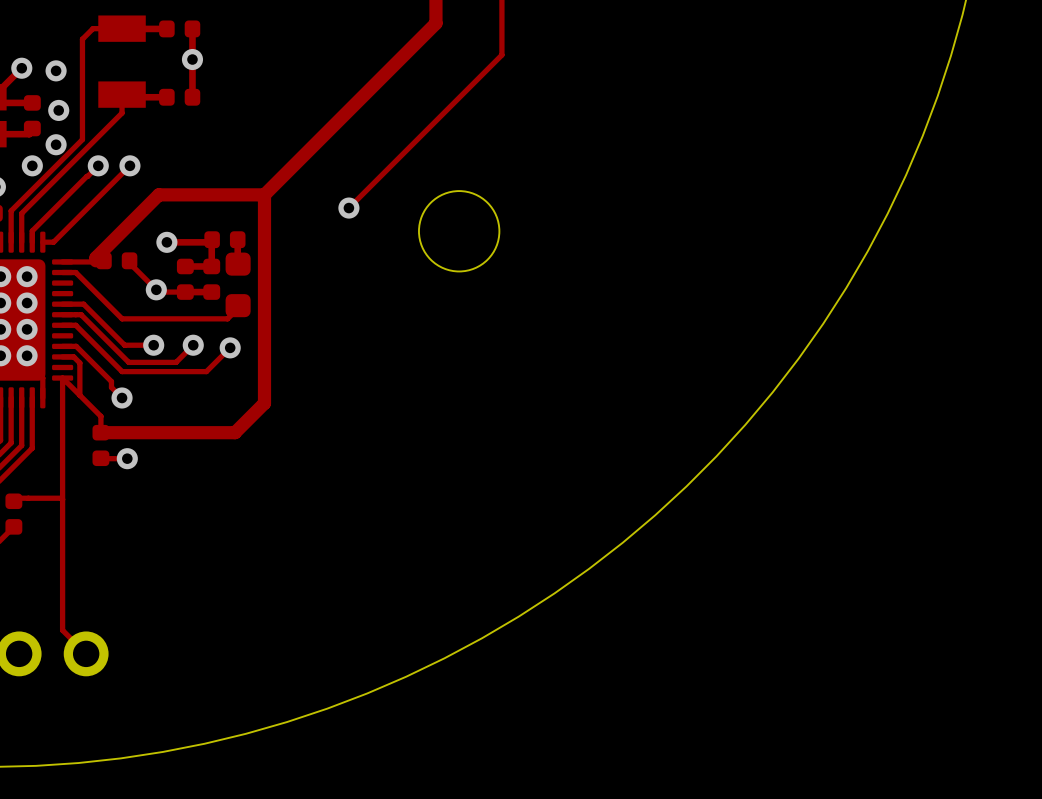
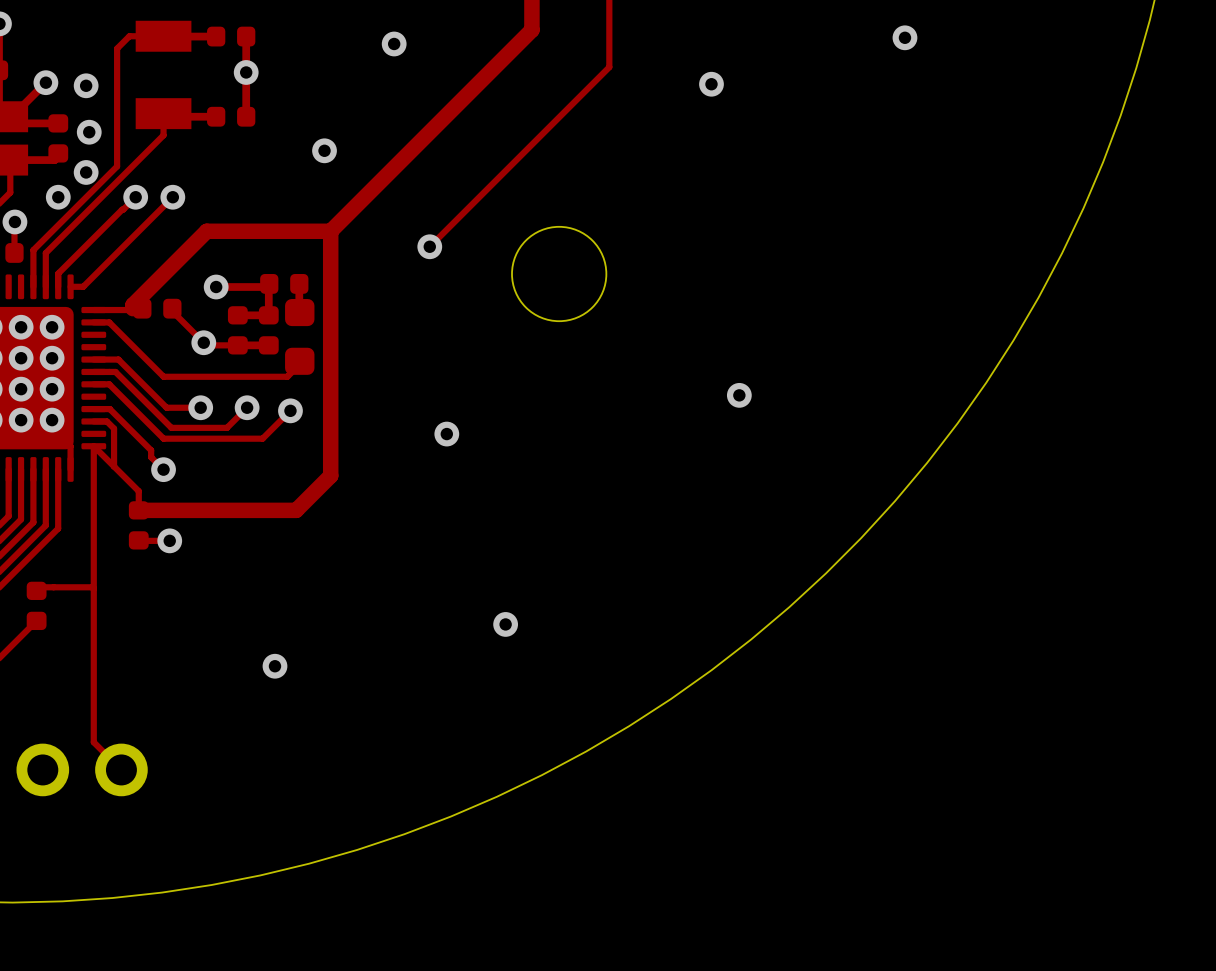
via: none -> (904, 37)
via: none -> (394, 43)
via: none -> (711, 84)
via: none -> (324, 150)
via: none -> (739, 395)
via: none -> (446, 434)
via: none -> (505, 624)
via: none -> (274, 666)

